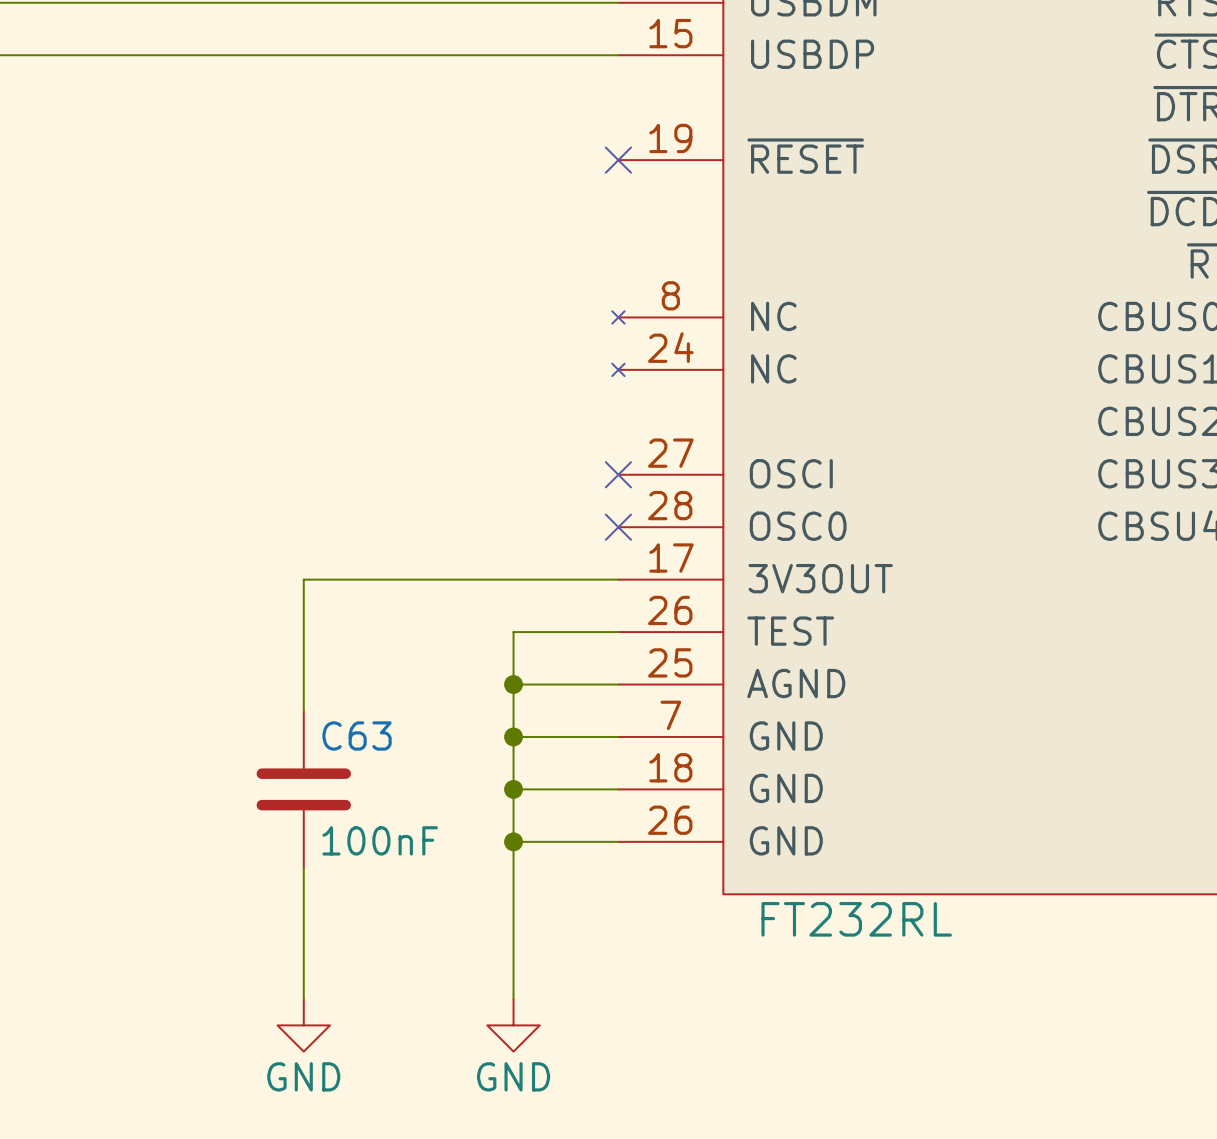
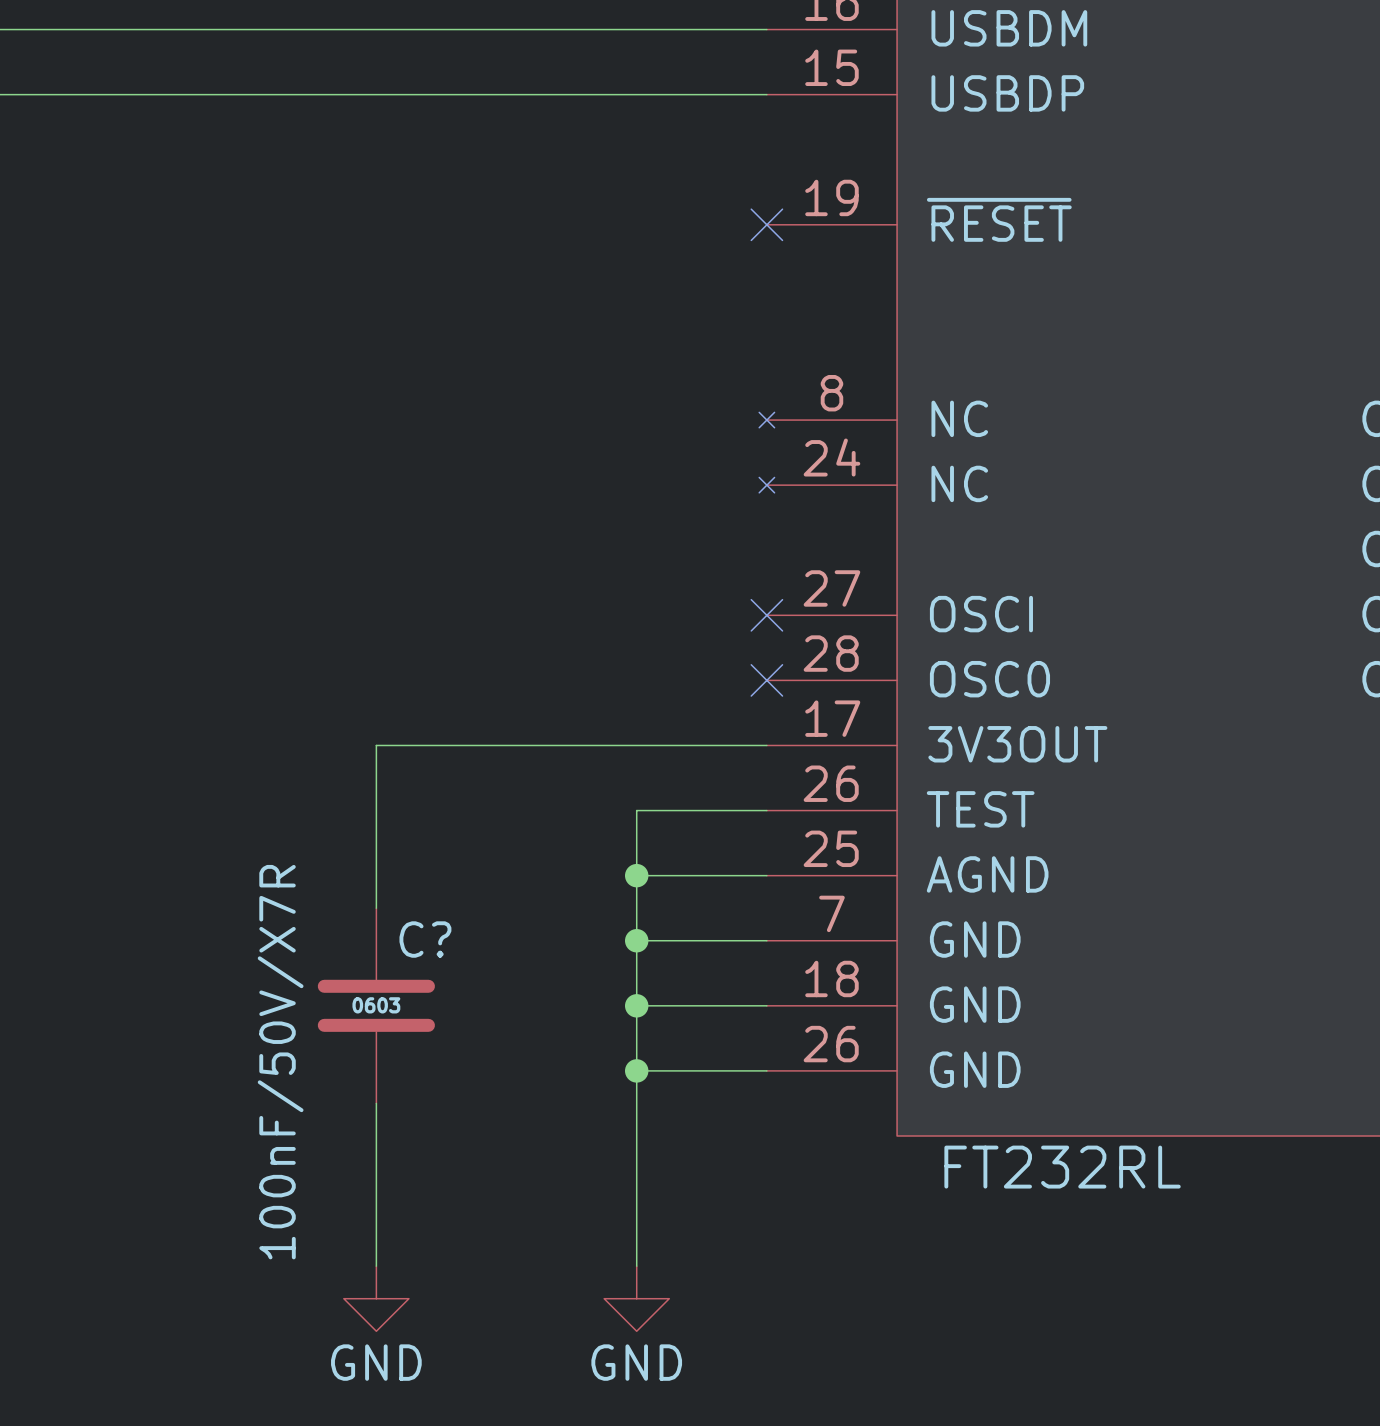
C63 name: C63 (357, 735) -> C? (425, 939)
C63 text: none -> 0603 (376, 1005)
C63 value: 100nF (380, 840) -> 100nF/50V/X7R (280, 1062)

